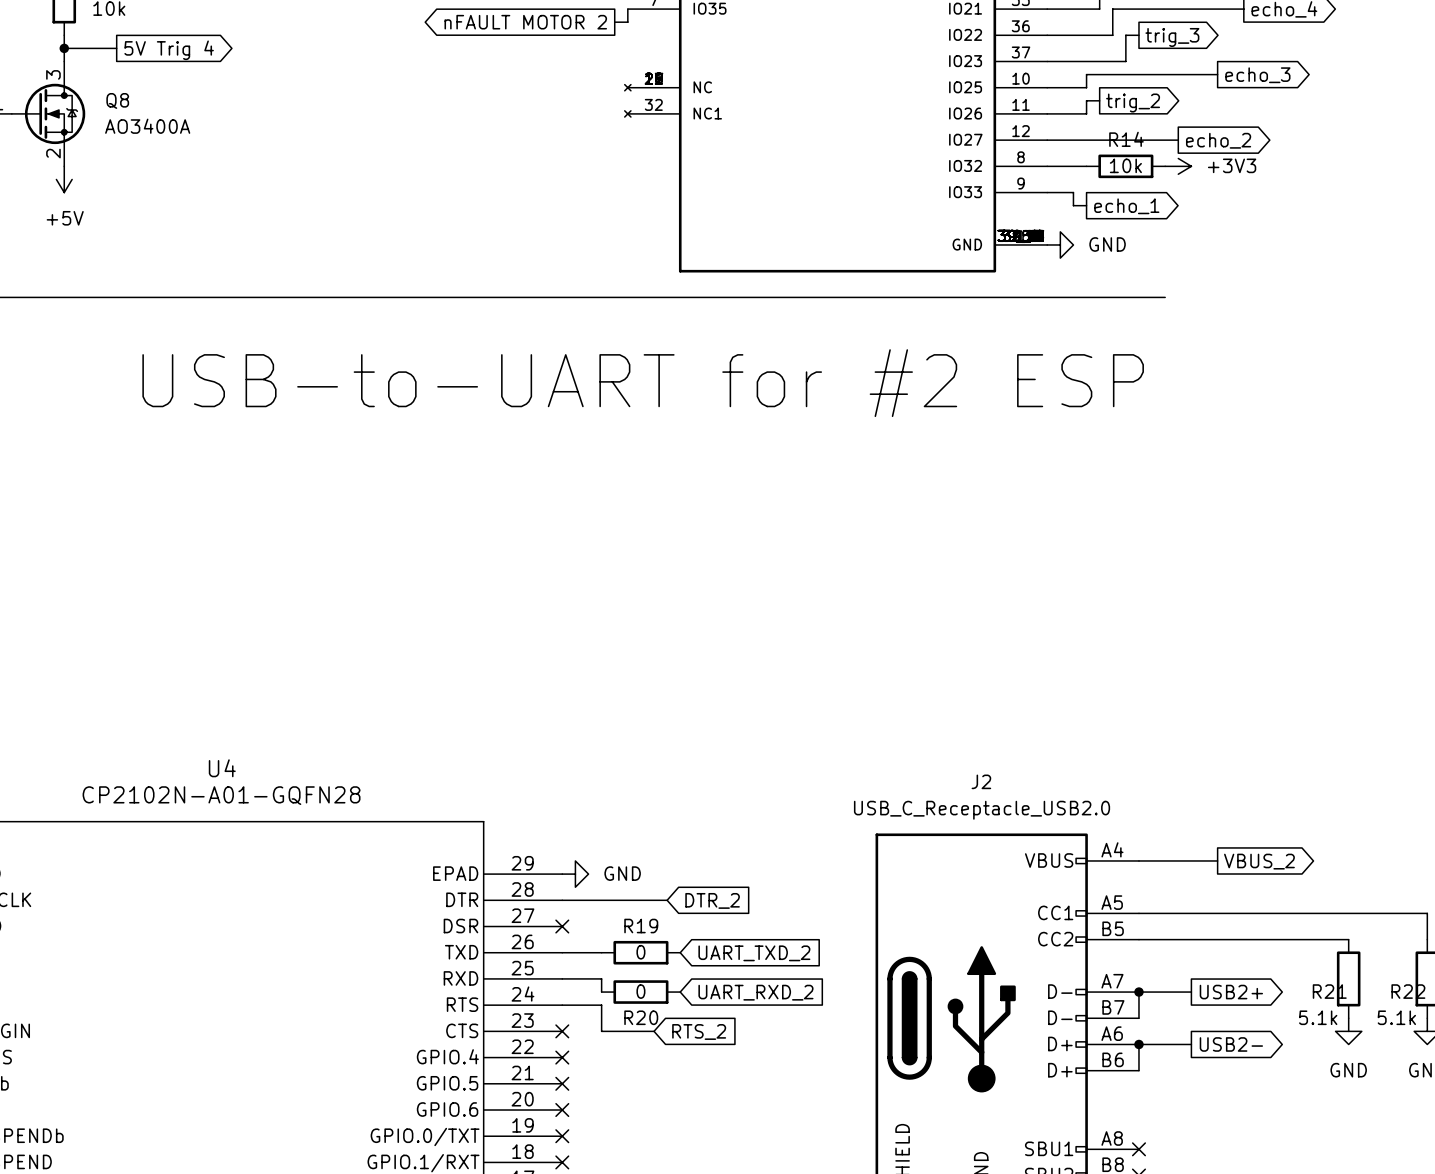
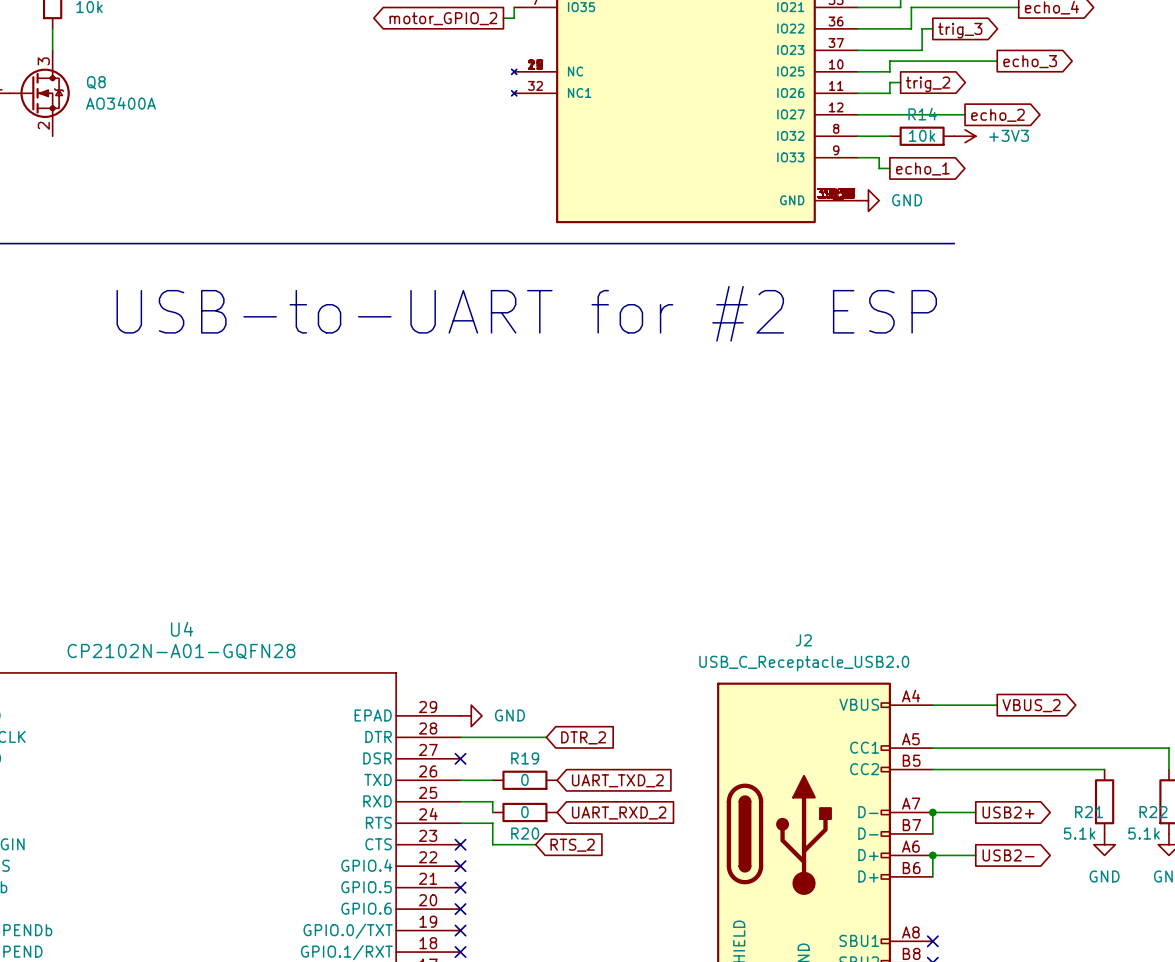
global label: nFAULT MOTOR 2 (525, 22) -> motor_GPIO_2 (443, 18)
wire: (64, 48) (116, 48) -> none
junction: (64, 48) -> none
global label: 5V Trig 4 (169, 50) -> none
power symbol: +5V (64, 179) -> none

